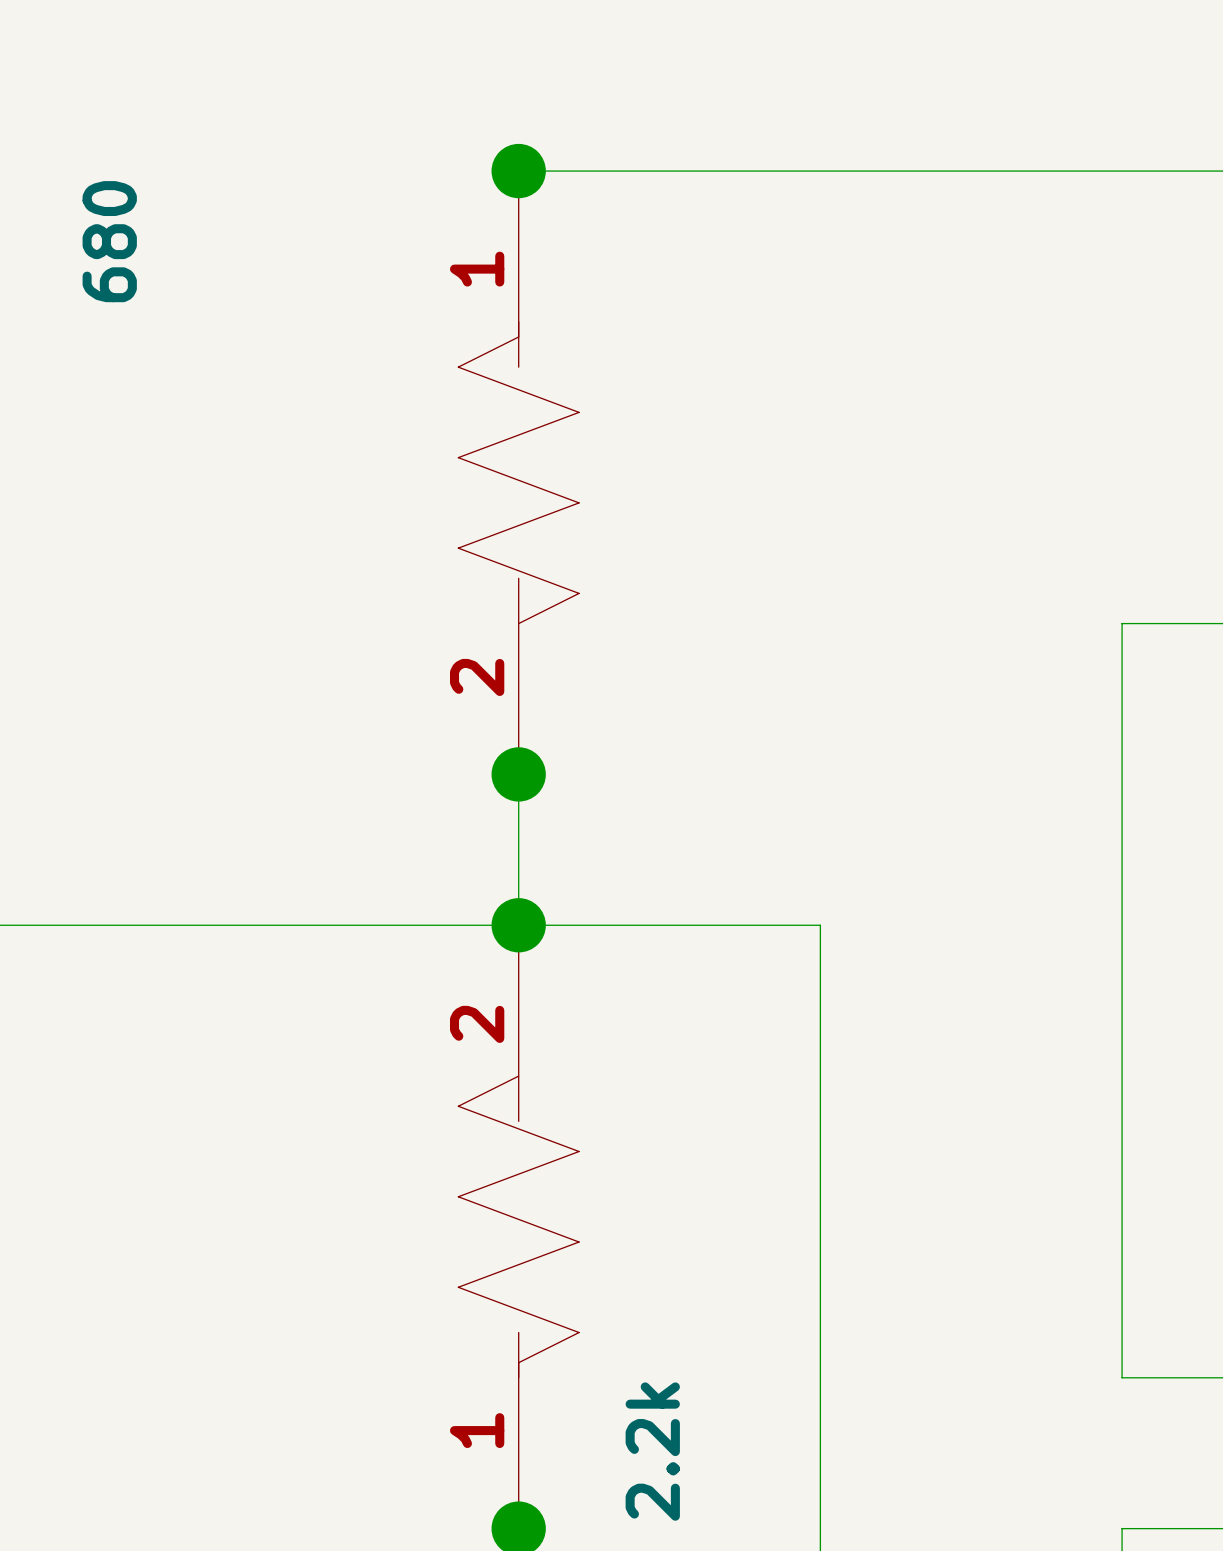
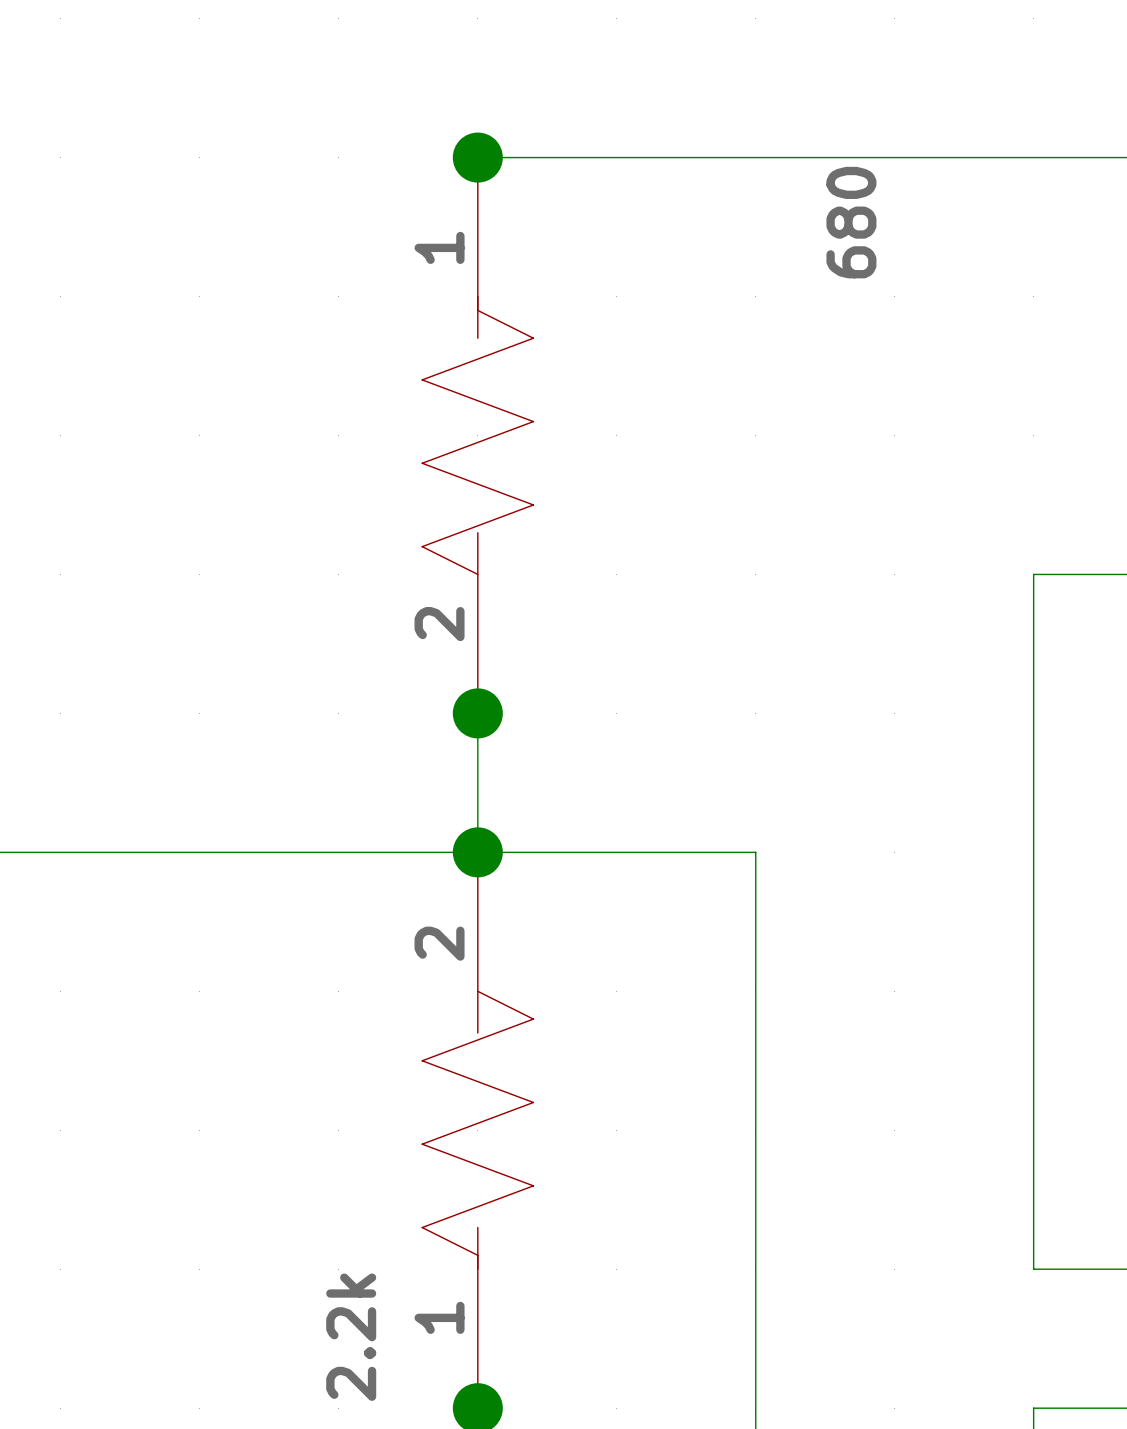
part flip: as is (518, 472) -> left-right (477, 435)
part flip: as is (518, 1226) -> left-right (477, 1130)

